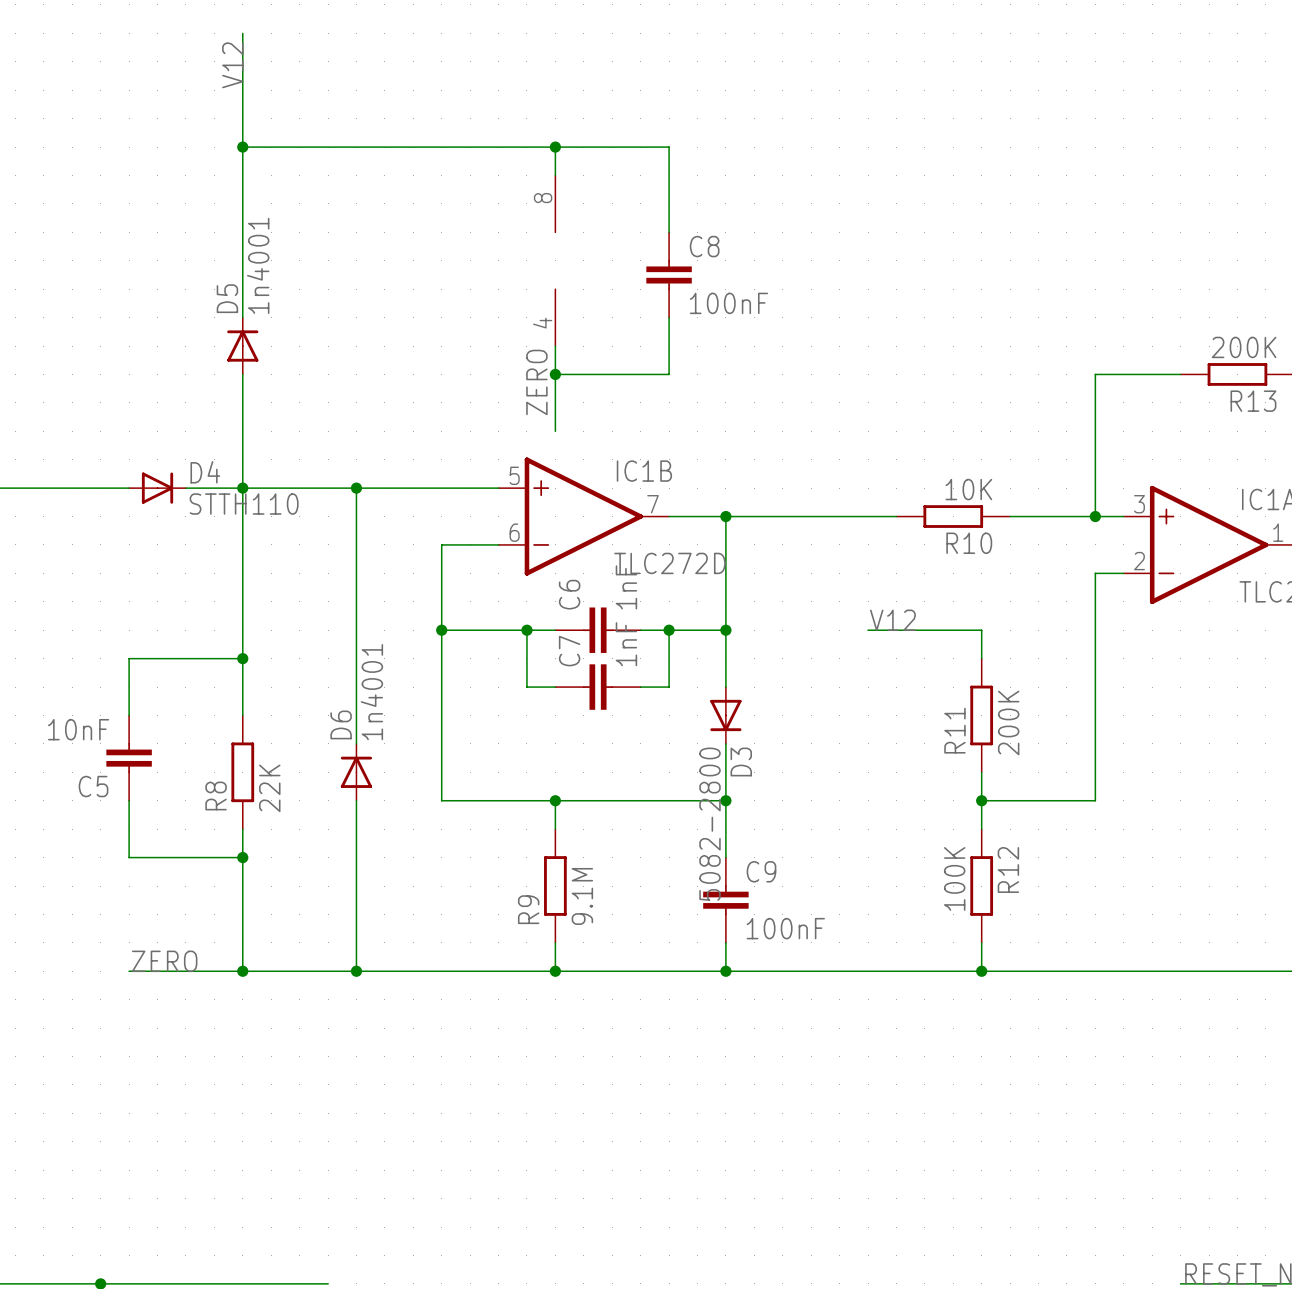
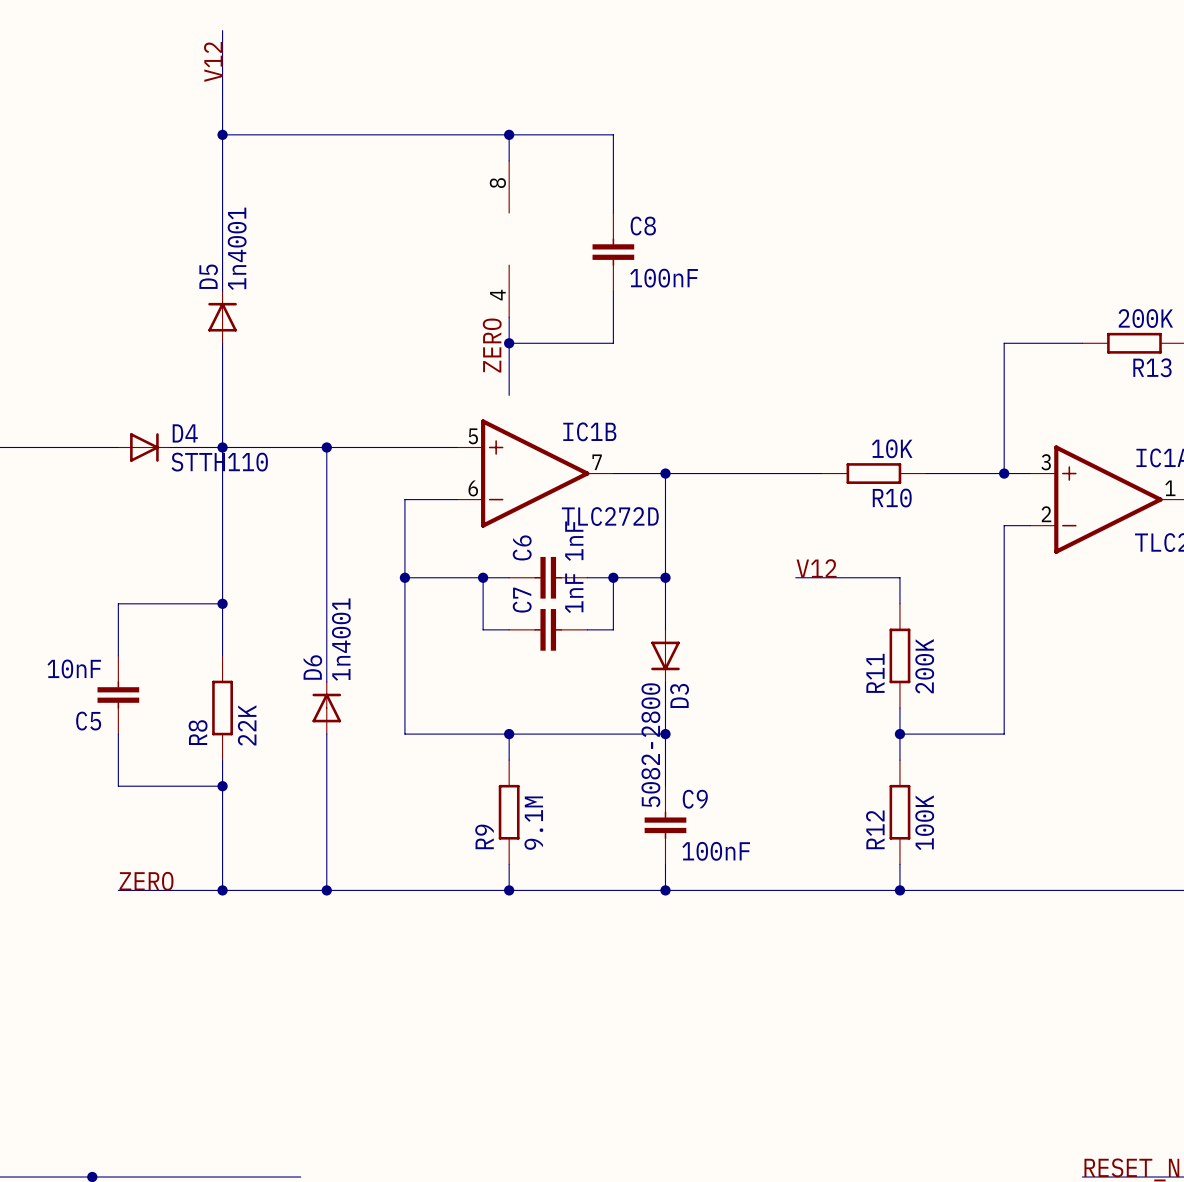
R12 name position: R12 (1008, 869) -> R12 (875, 829)
R12 value position: 100K (954, 878) -> 100K (924, 822)

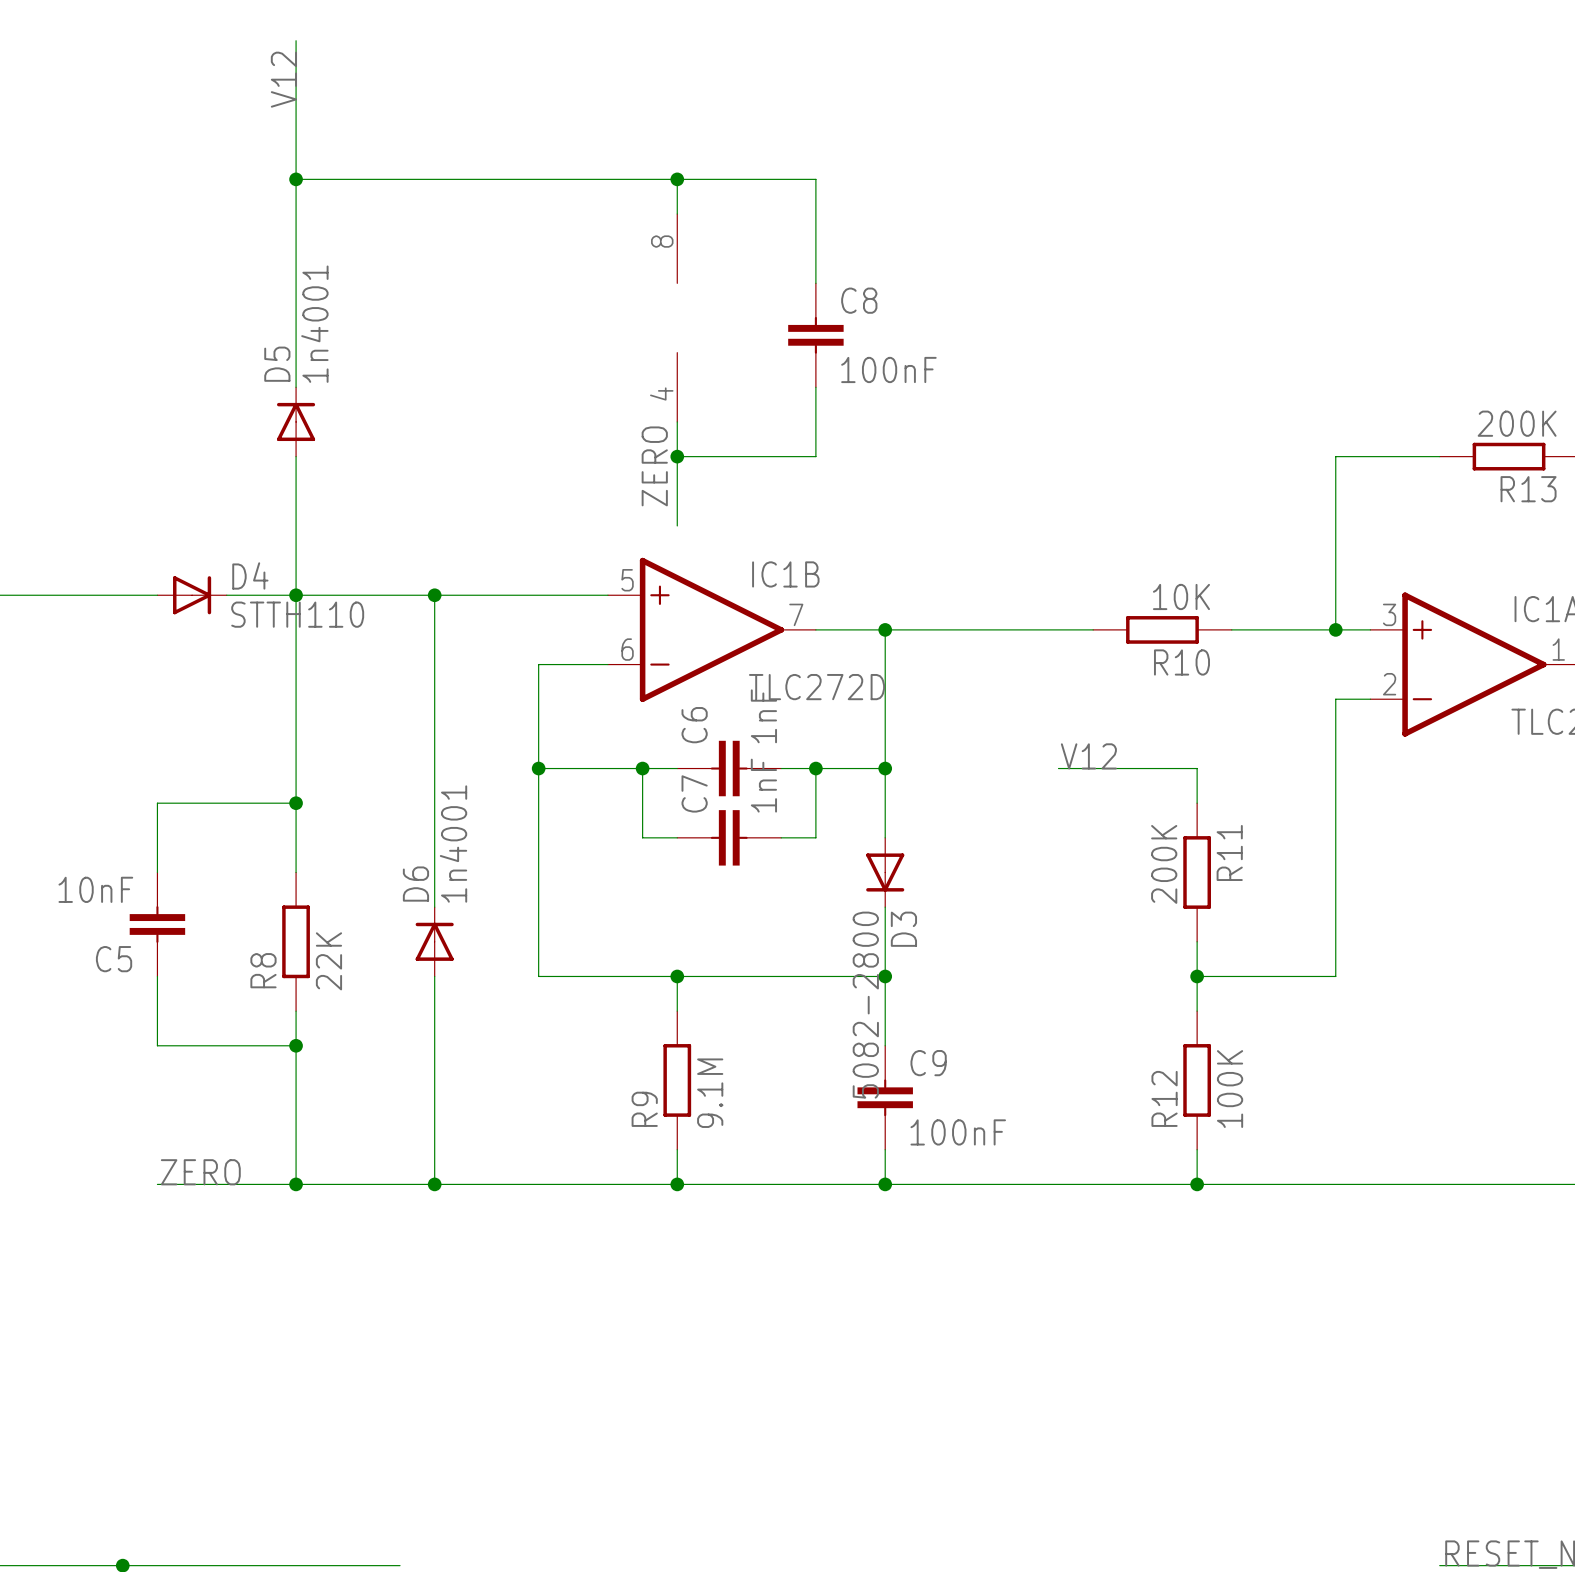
R11 value position: 200K (924, 666) -> 200K (1164, 864)
R11 name position: R11 (875, 673) -> R11 (1229, 852)

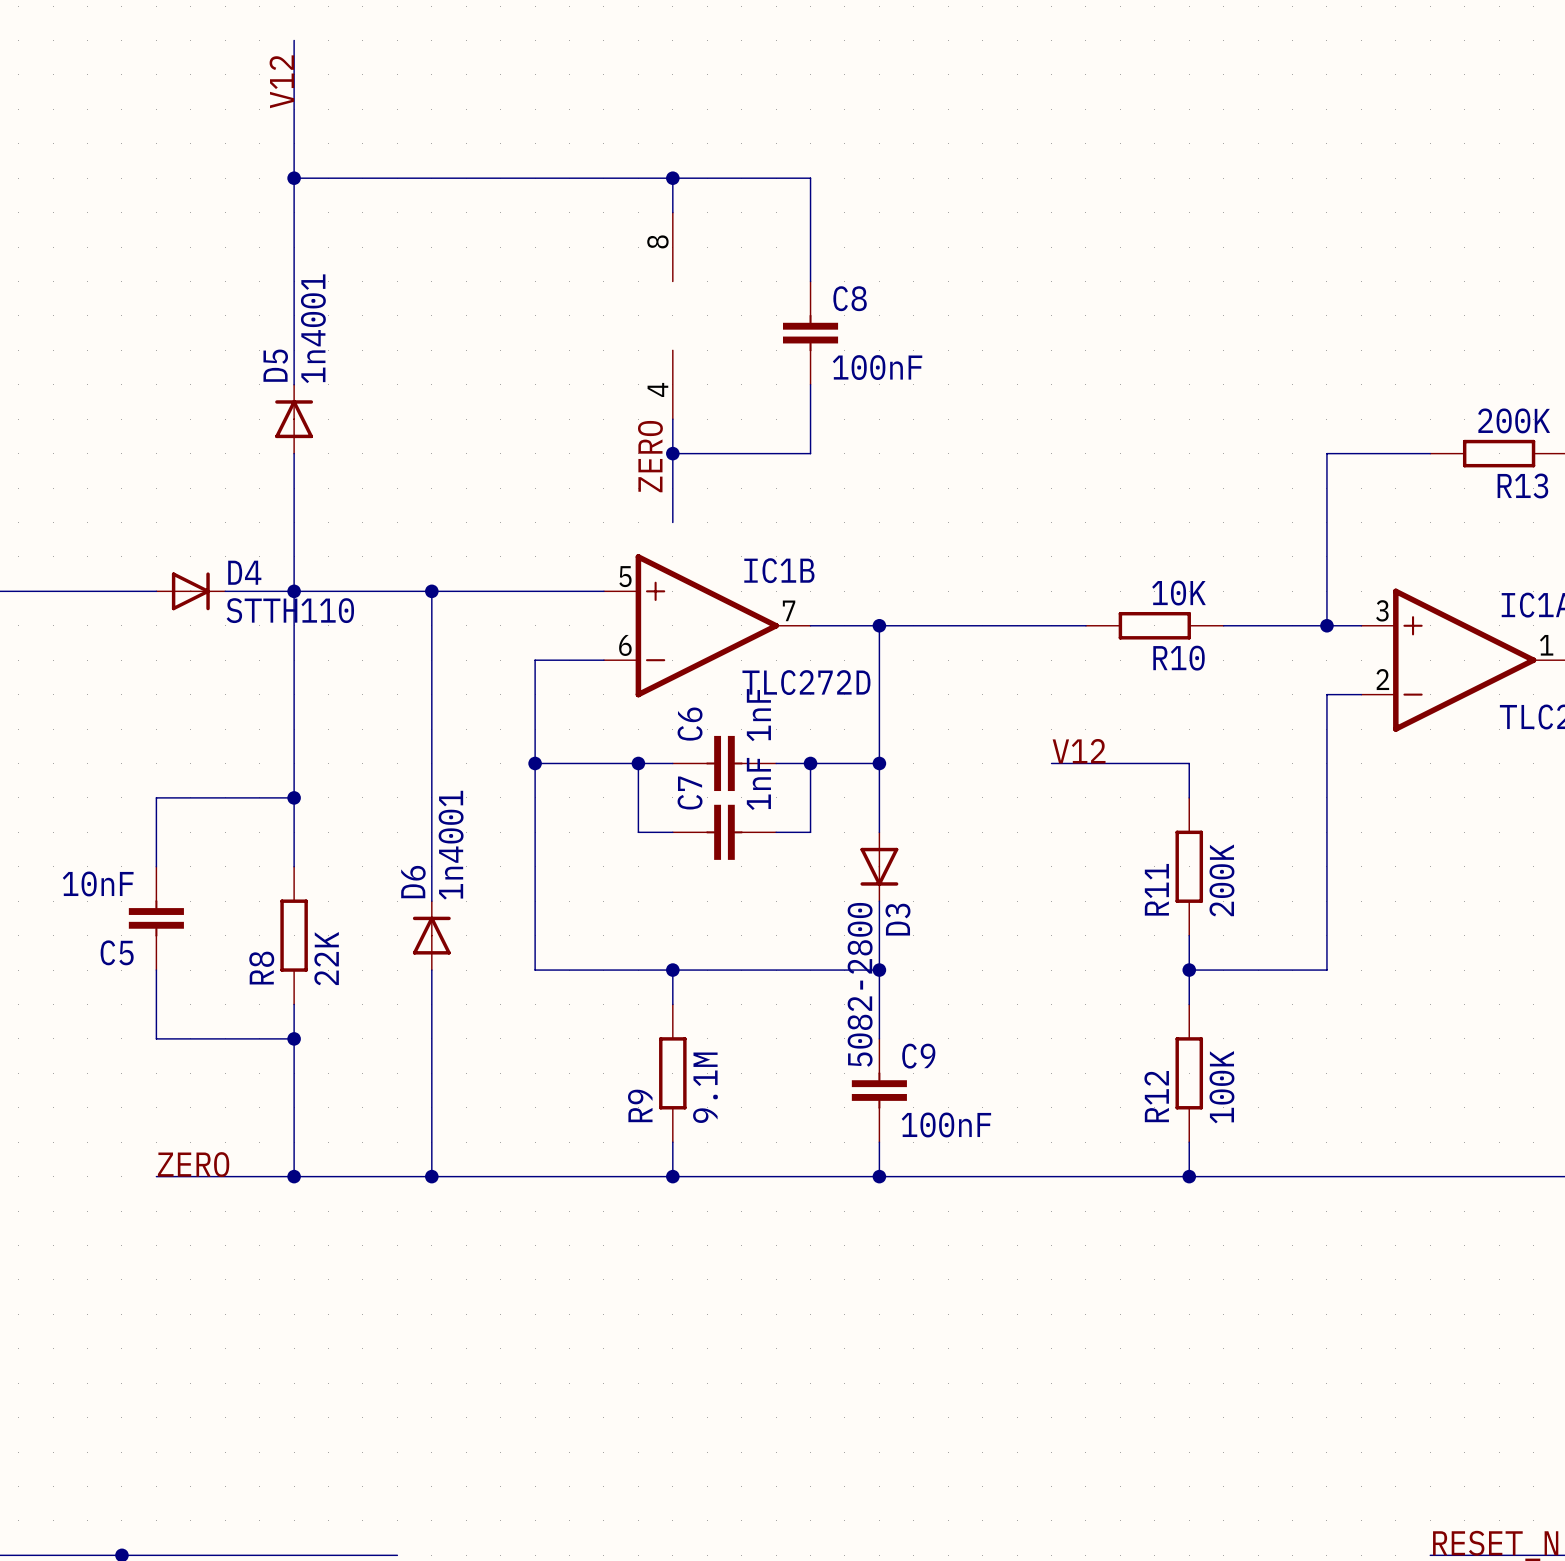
R11 name position: R11 (1229, 852) -> R11 (1156, 889)
R11 value position: 200K (1164, 864) -> 200K (1221, 880)

